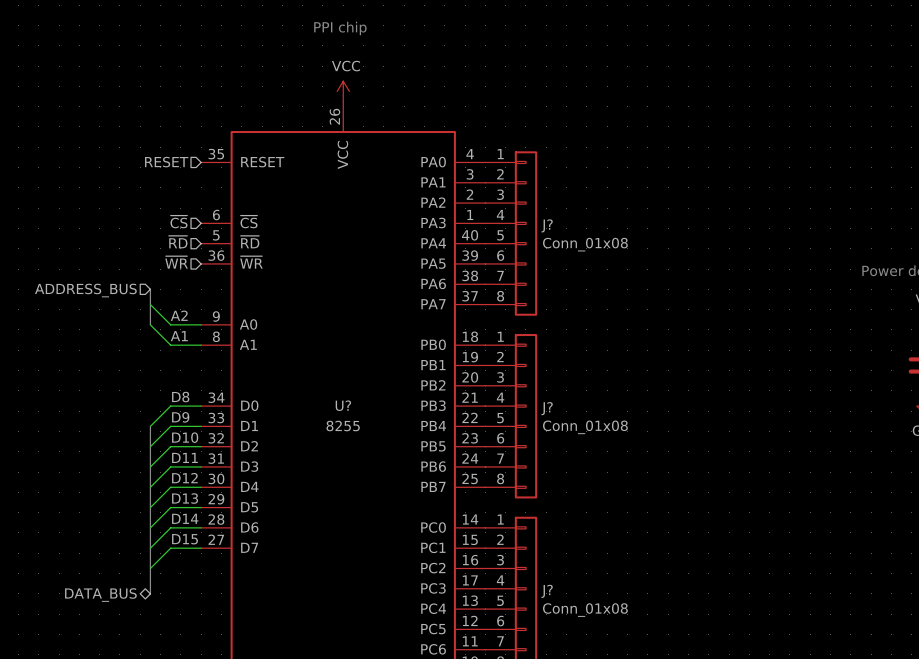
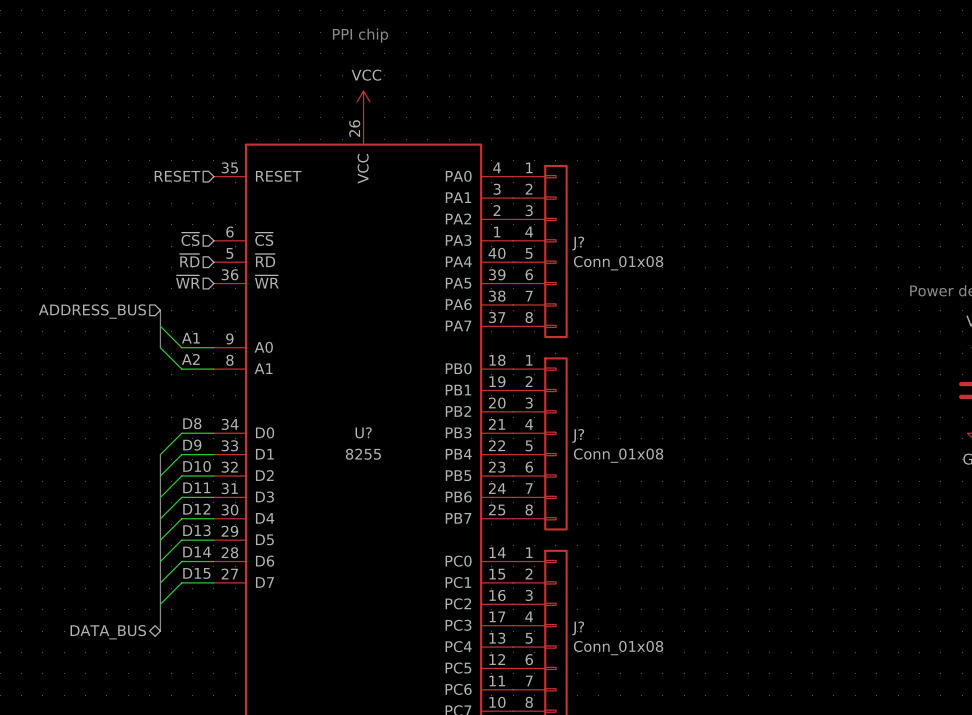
label: A2 (179, 315) -> A1 (190, 338)
label: A1 (179, 336) -> A2 (190, 359)

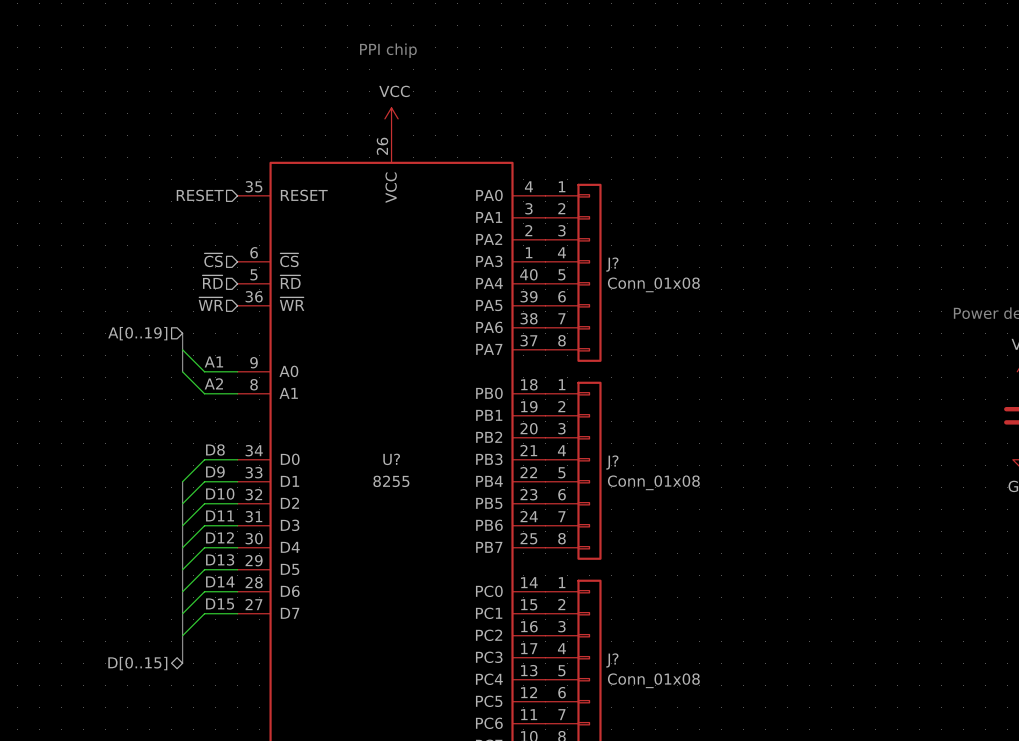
hierarchical label: ADDRESS_BUS (92, 311) -> A[0..19] (137, 333)
hierarchical label: DATA_BUS (108, 632) -> D[0..15] (137, 663)

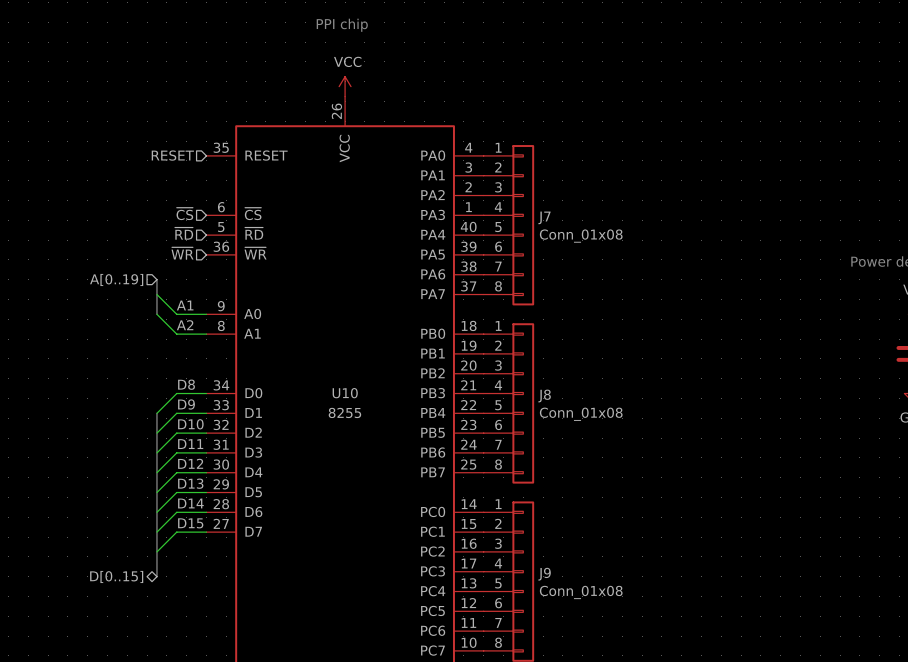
J? name: J? (612, 264) -> J7 (544, 217)
U? name: U? (391, 459) -> U10 (345, 393)
J? name: J? (612, 462) -> J8 (544, 396)
J? name: J? (612, 660) -> J9 (544, 574)

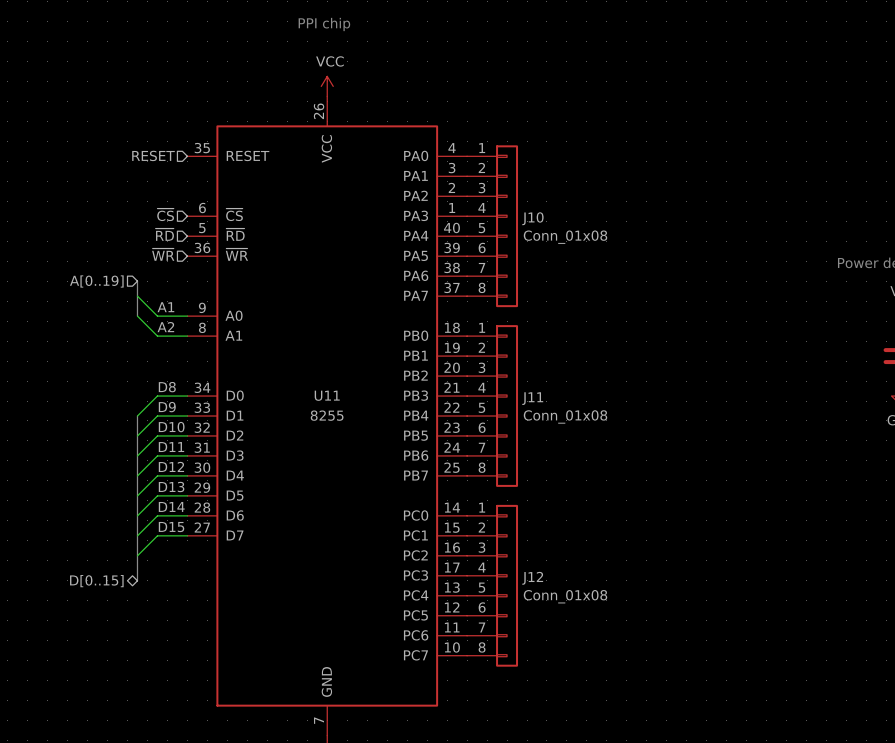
J7 name: J7 (544, 217) -> J10 (532, 218)
U10 name: U10 (345, 393) -> U11 (327, 395)
J8 name: J8 (544, 396) -> J11 (532, 398)
J9 name: J9 (544, 574) -> J12 (532, 578)

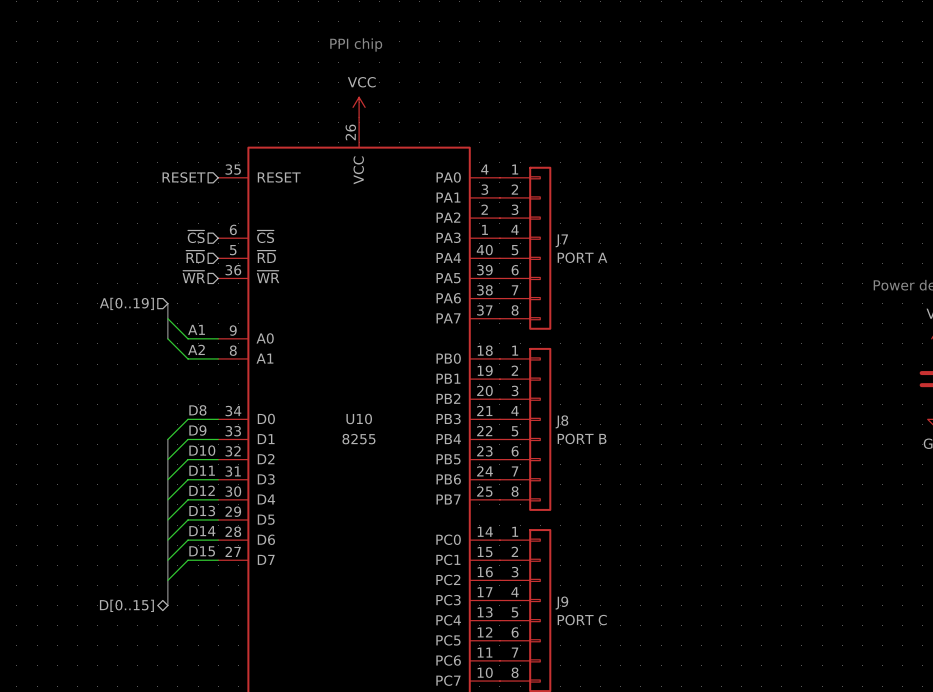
J10 name: J10 (532, 218) -> J7 (561, 240)
J10 value: Conn_01x08 (565, 237) -> PORT A (582, 257)
U11 name: U11 (327, 395) -> U10 (359, 418)
J11 name: J11 (532, 398) -> J8 (561, 421)
J11 value: Conn_01x08 (565, 416) -> PORT B (582, 438)
J12 name: J12 (532, 578) -> J9 (561, 603)
J12 value: Conn_01x08 (565, 596) -> PORT C (582, 620)

